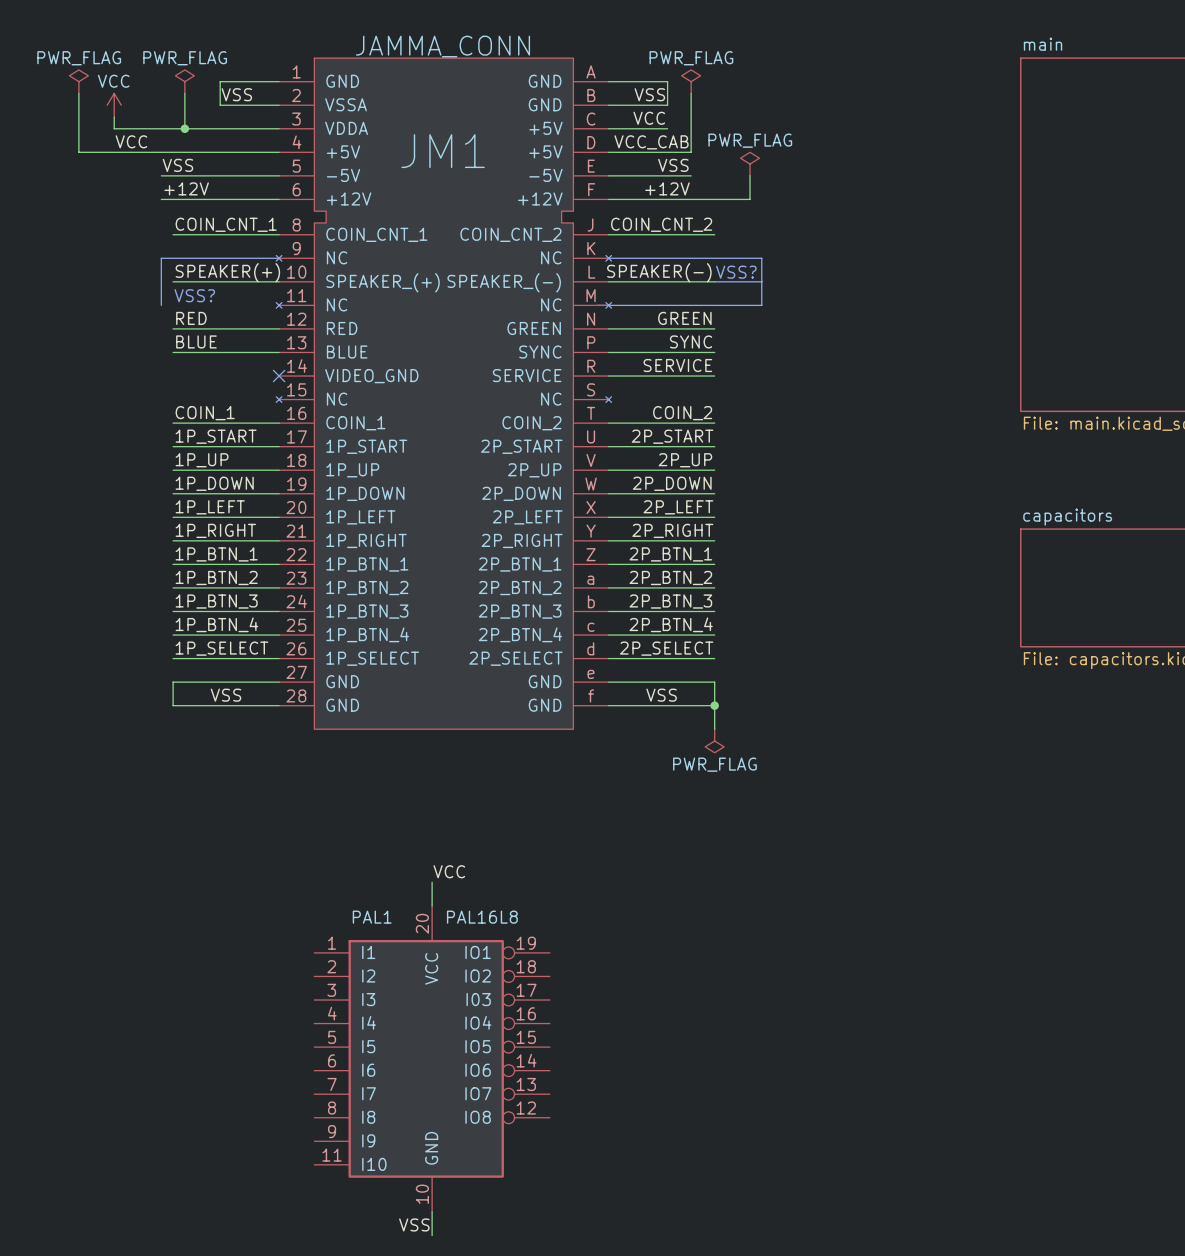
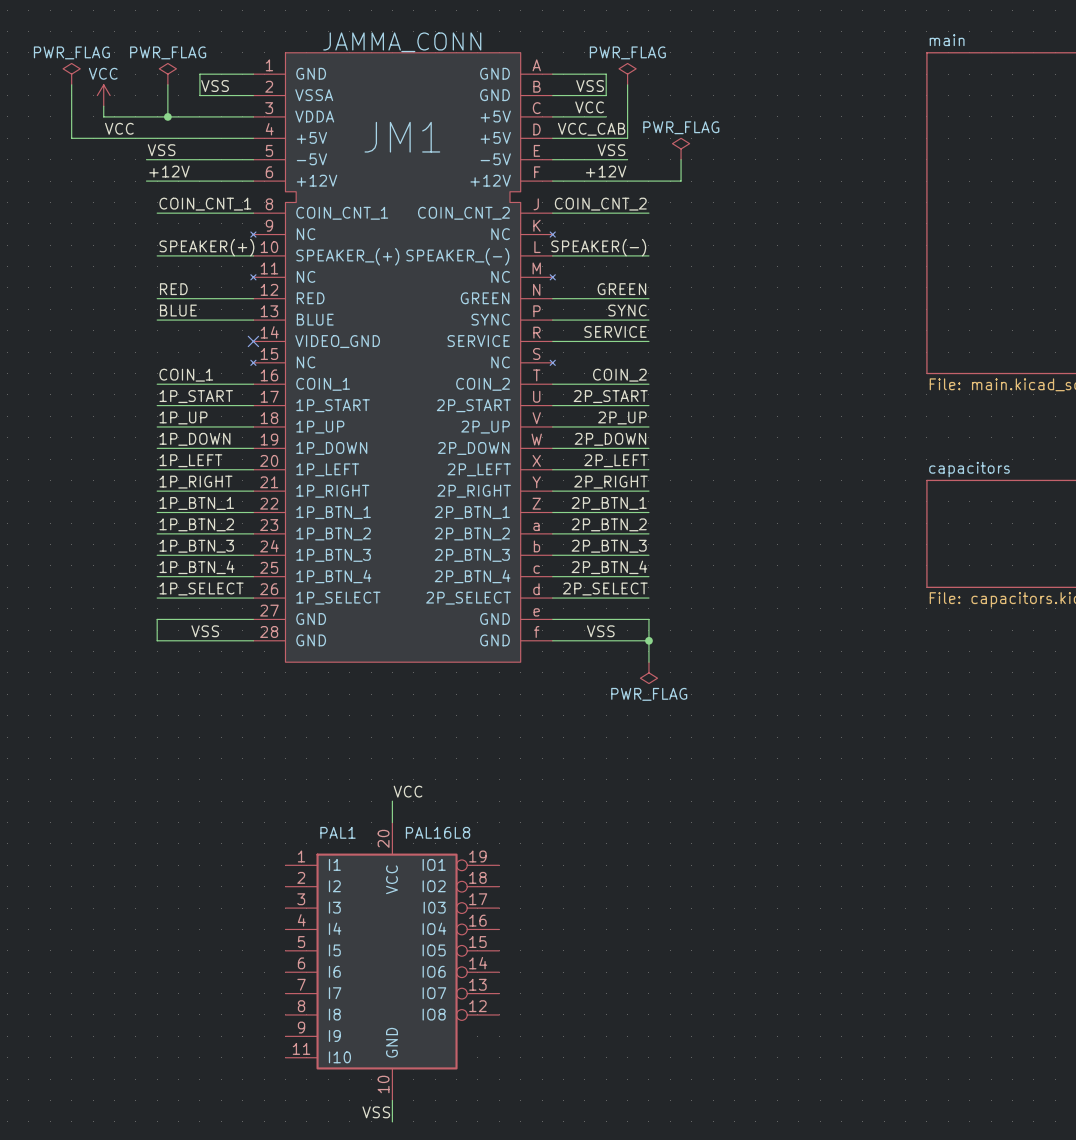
line: (279, 258) (161, 258) (161, 305) -> none
line: (608, 258) (761, 258) (761, 305) (596, 305) -> none
text: VSS? (736, 272) -> none
line: (714, 281) (761, 281) -> none
text: VSS? (194, 295) -> none

